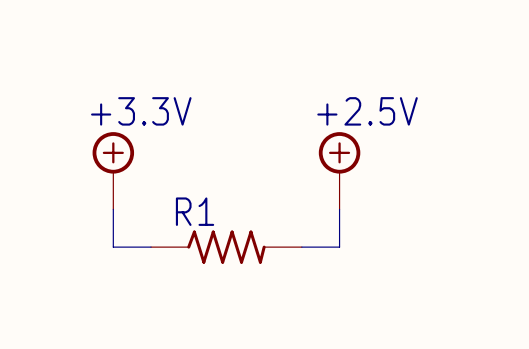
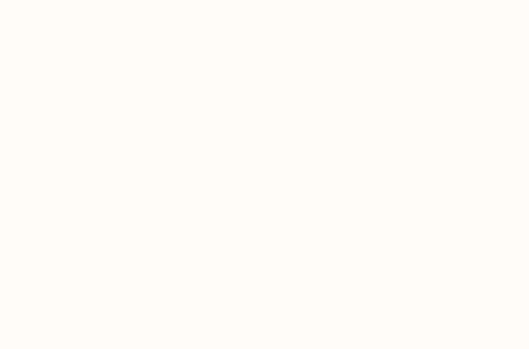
power symbol: +3.3V (113, 170) -> none
power symbol: +2.5V (339, 170) -> none
wire: (113, 209) (113, 247) (151, 247) -> none
wire: (339, 209) (339, 247) (301, 247) -> none
R1: (226, 247) -> none

